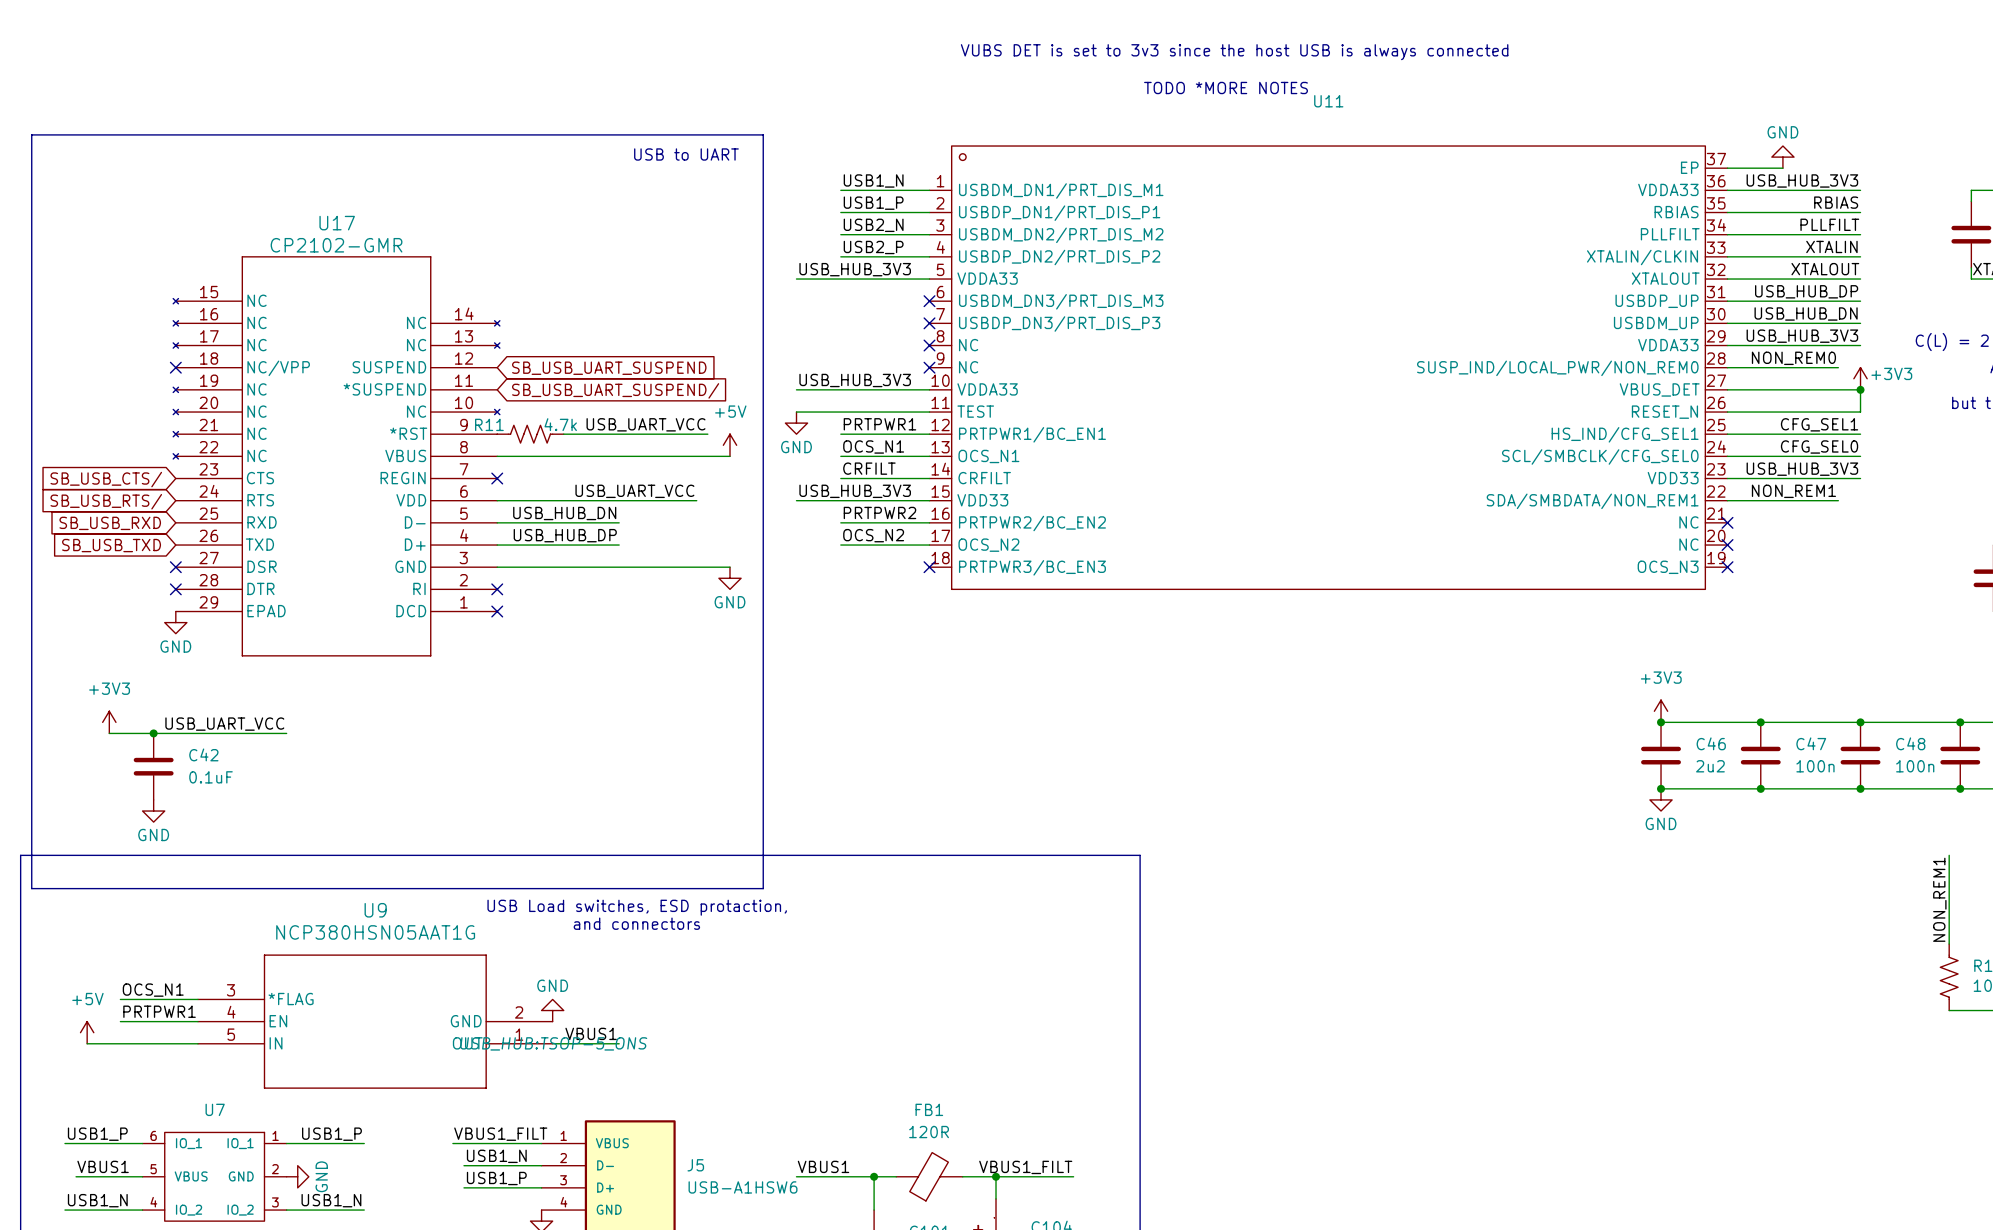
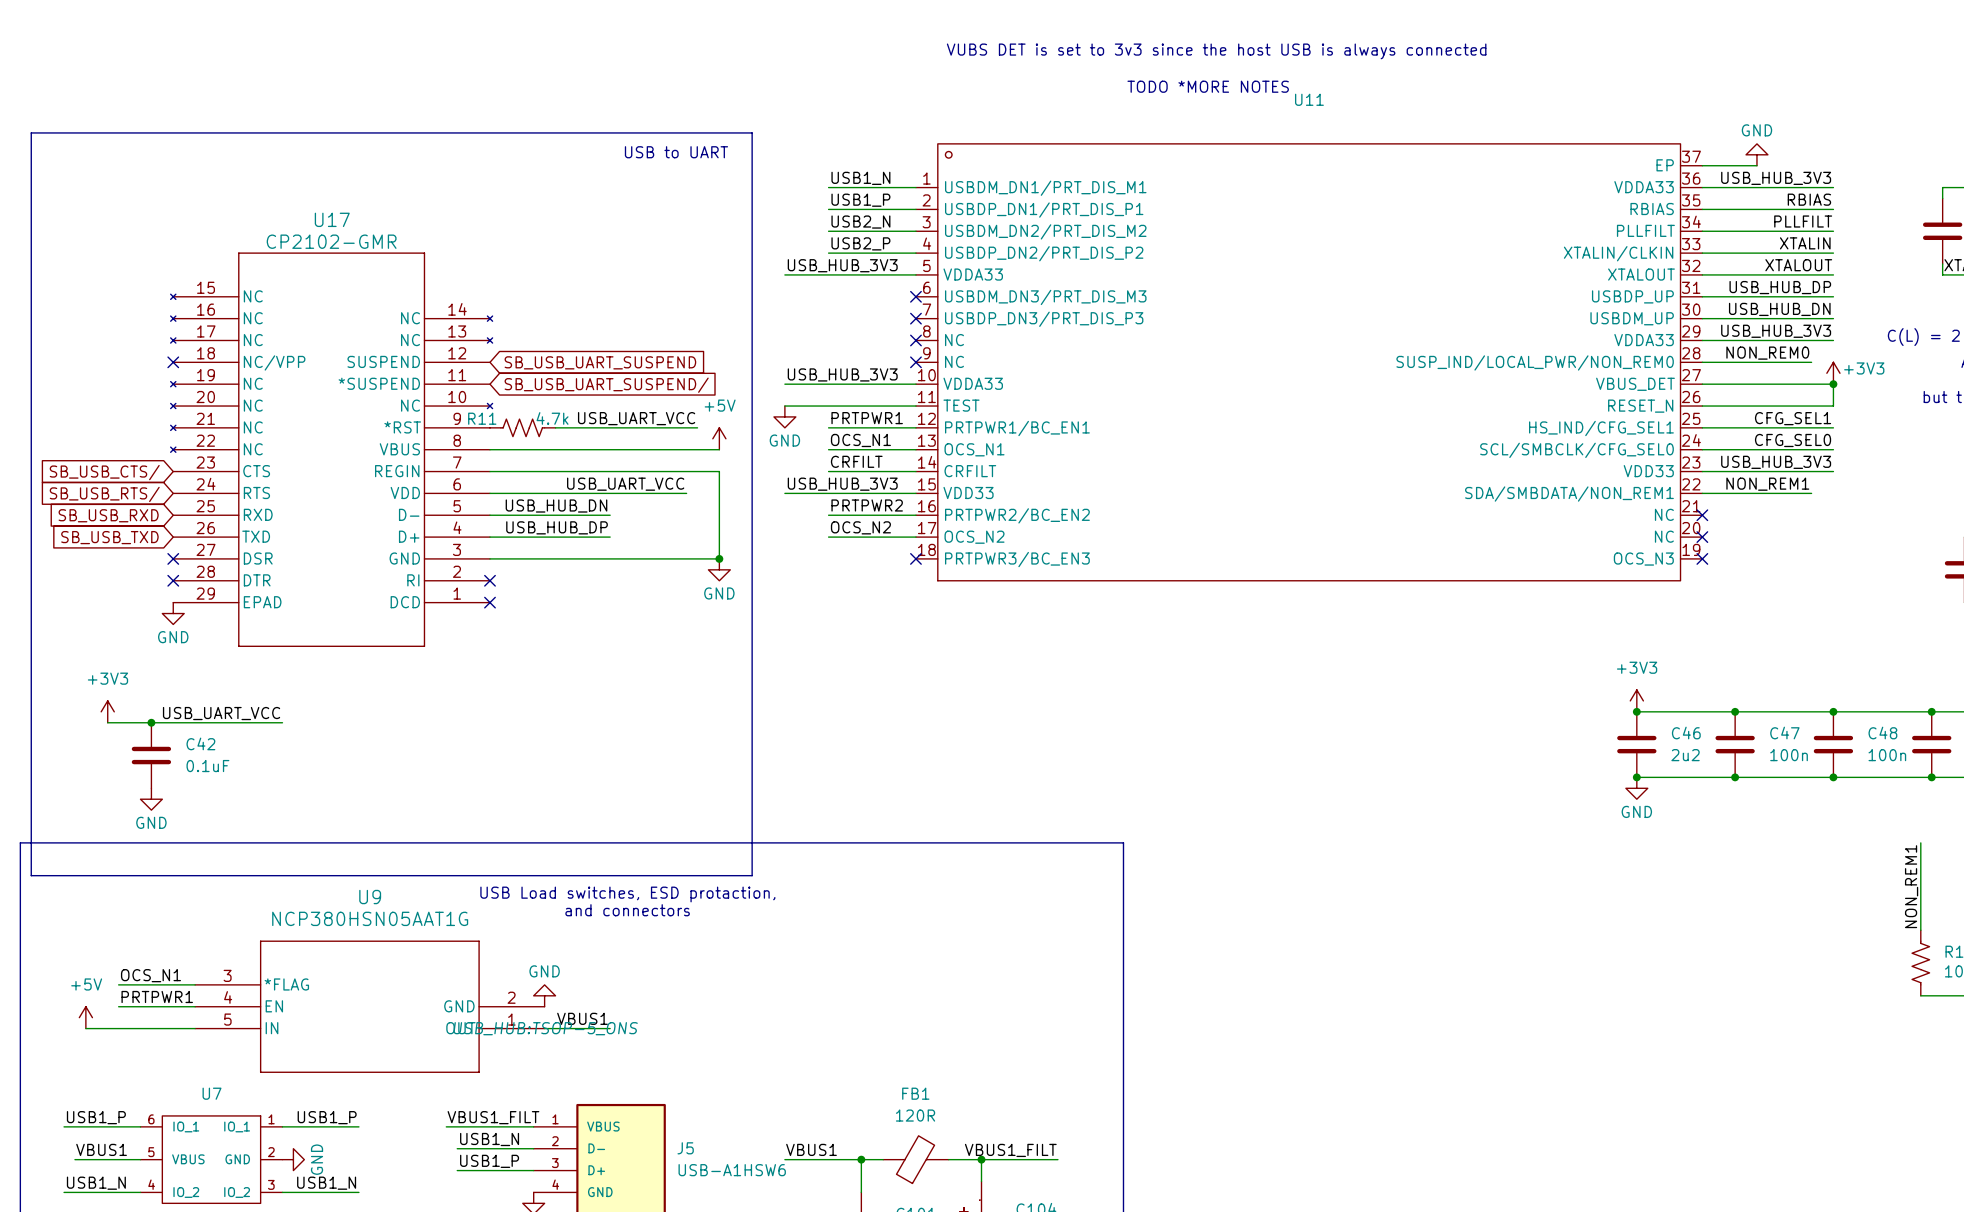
wire: none -> (490, 471) (719, 471) (719, 558)
no-connect mark: (497, 478) -> none
junction: none -> (719, 558)

